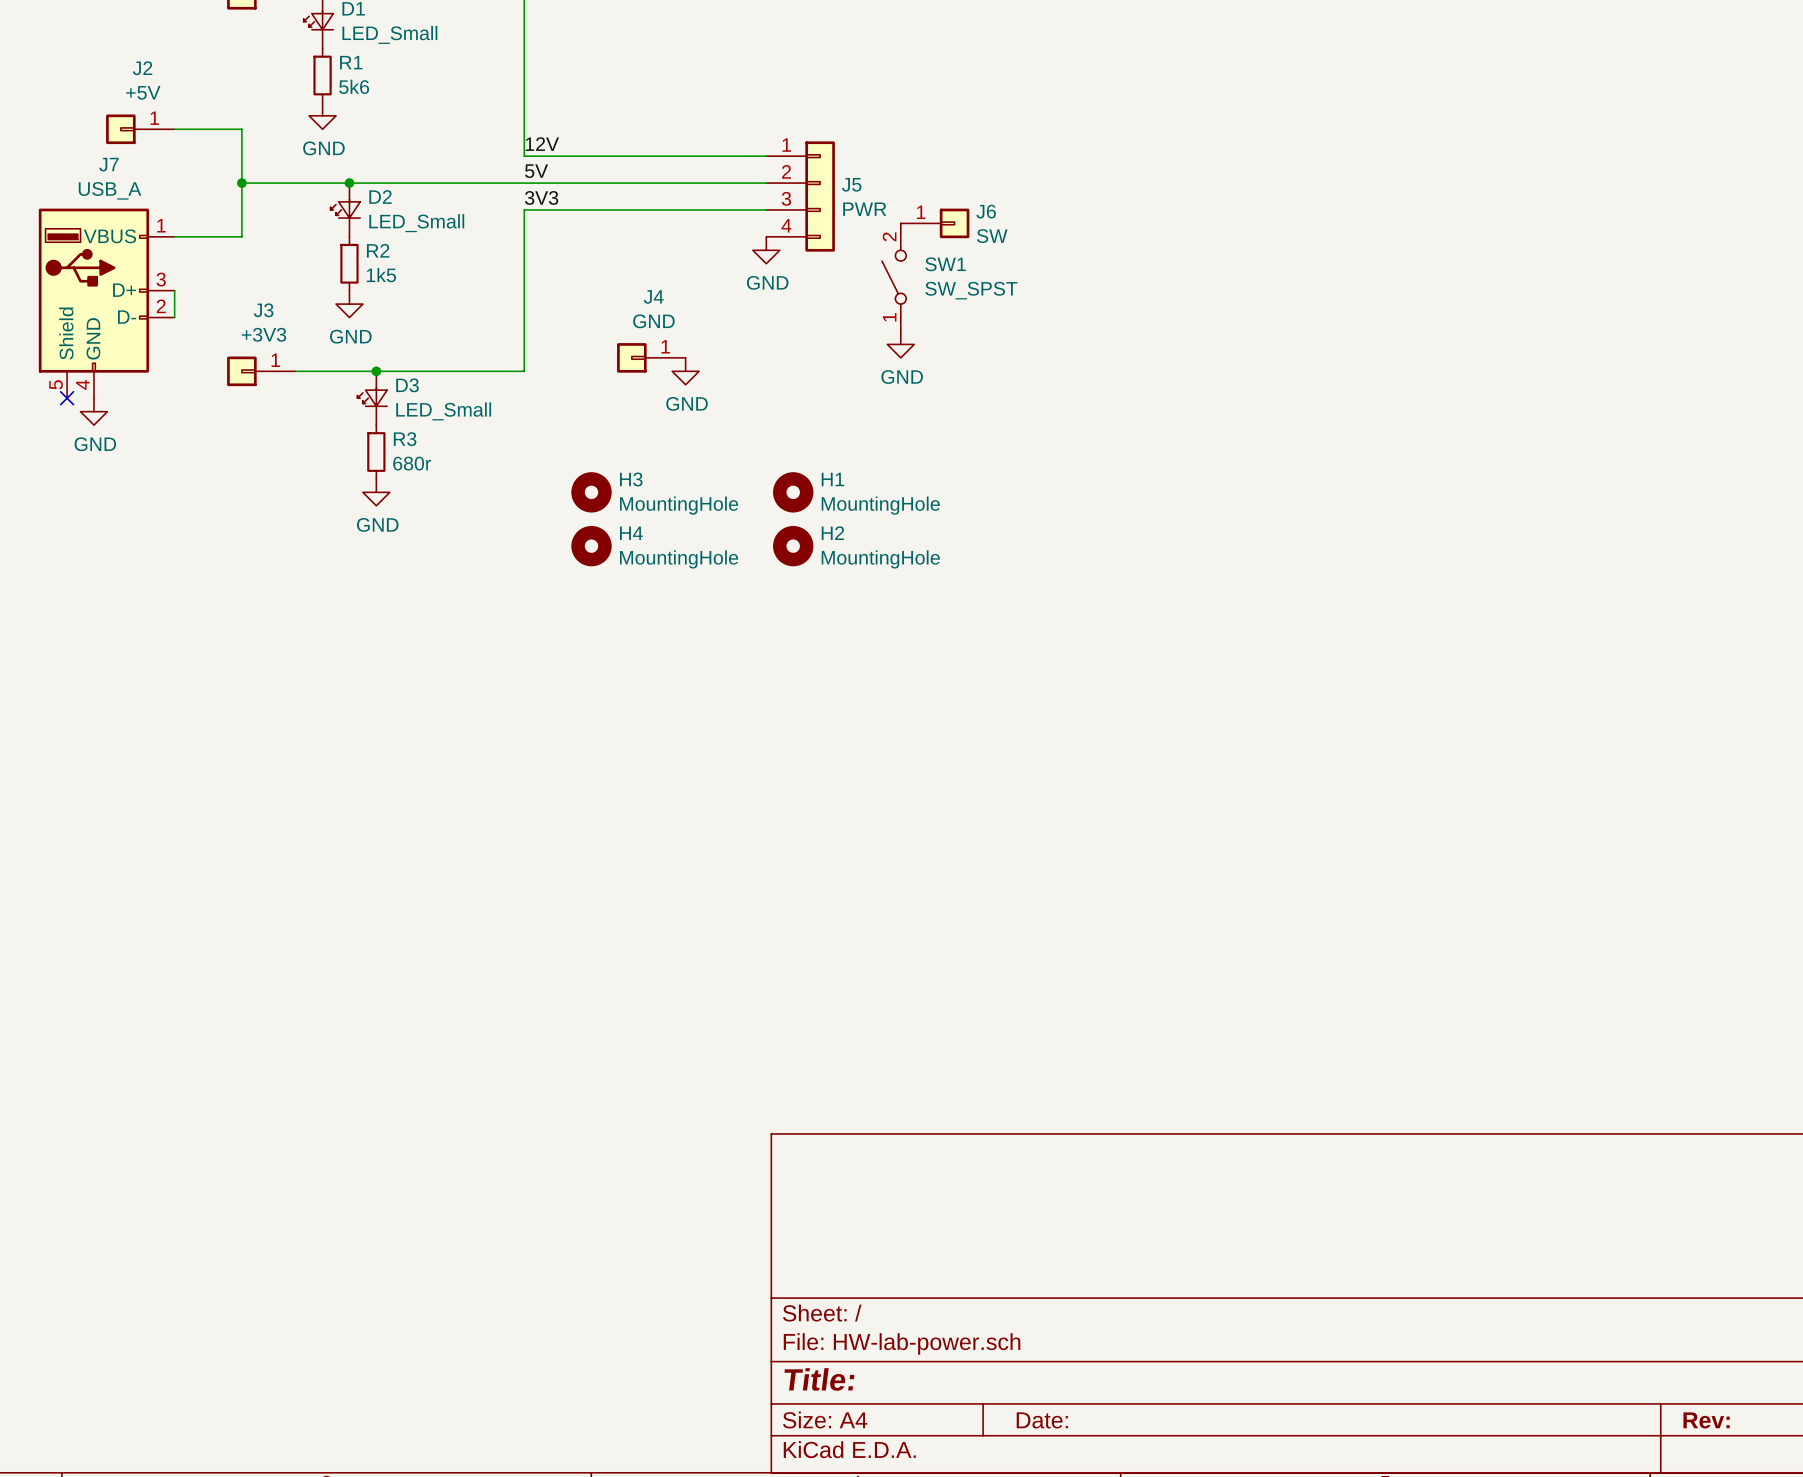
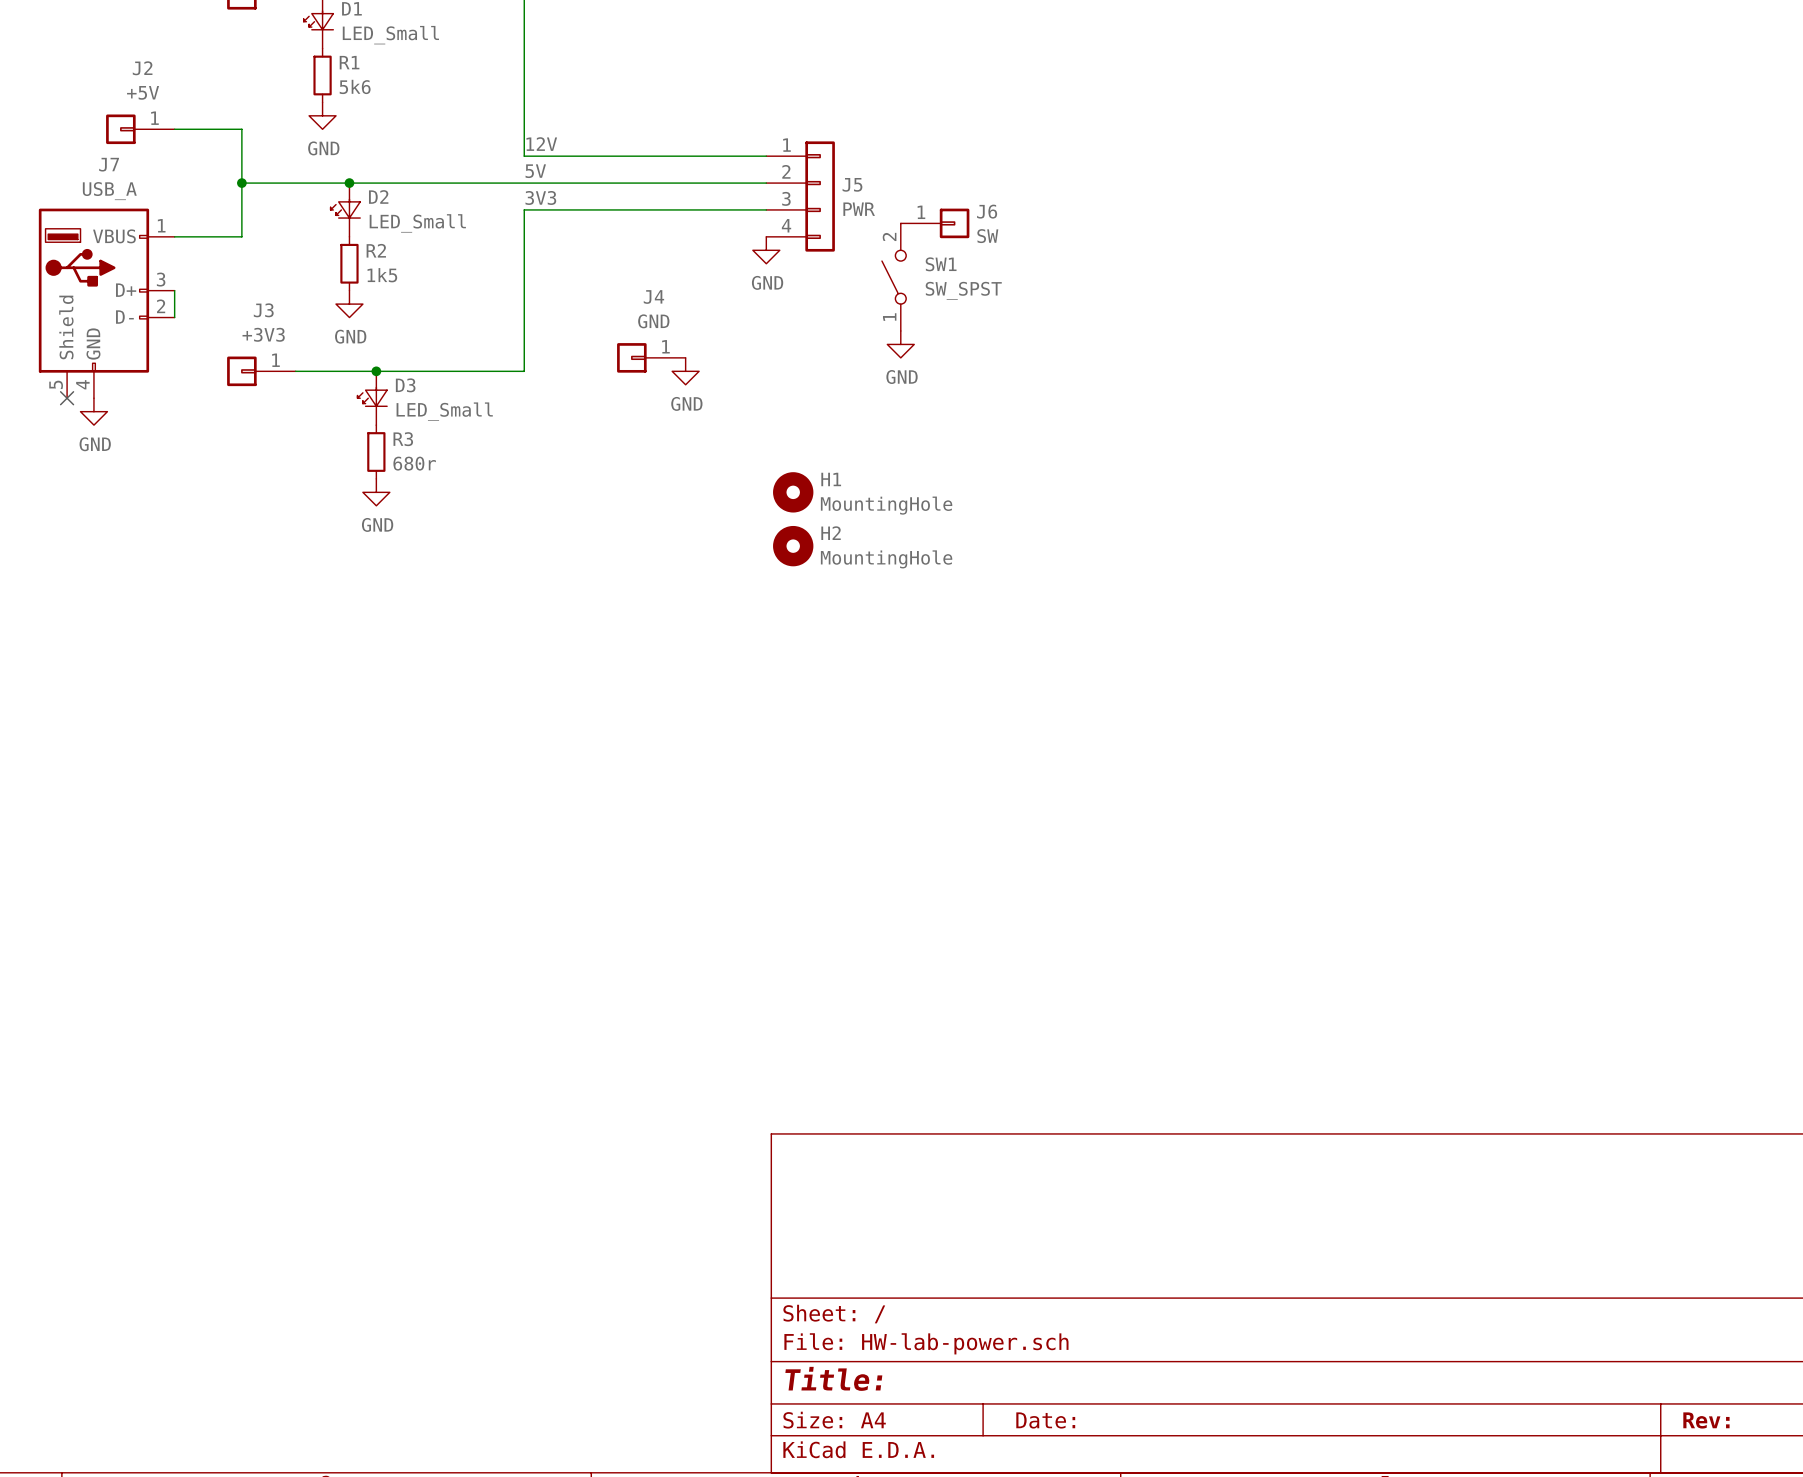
H3: MountingHole (591, 492) -> none
H4: MountingHole (591, 546) -> none

